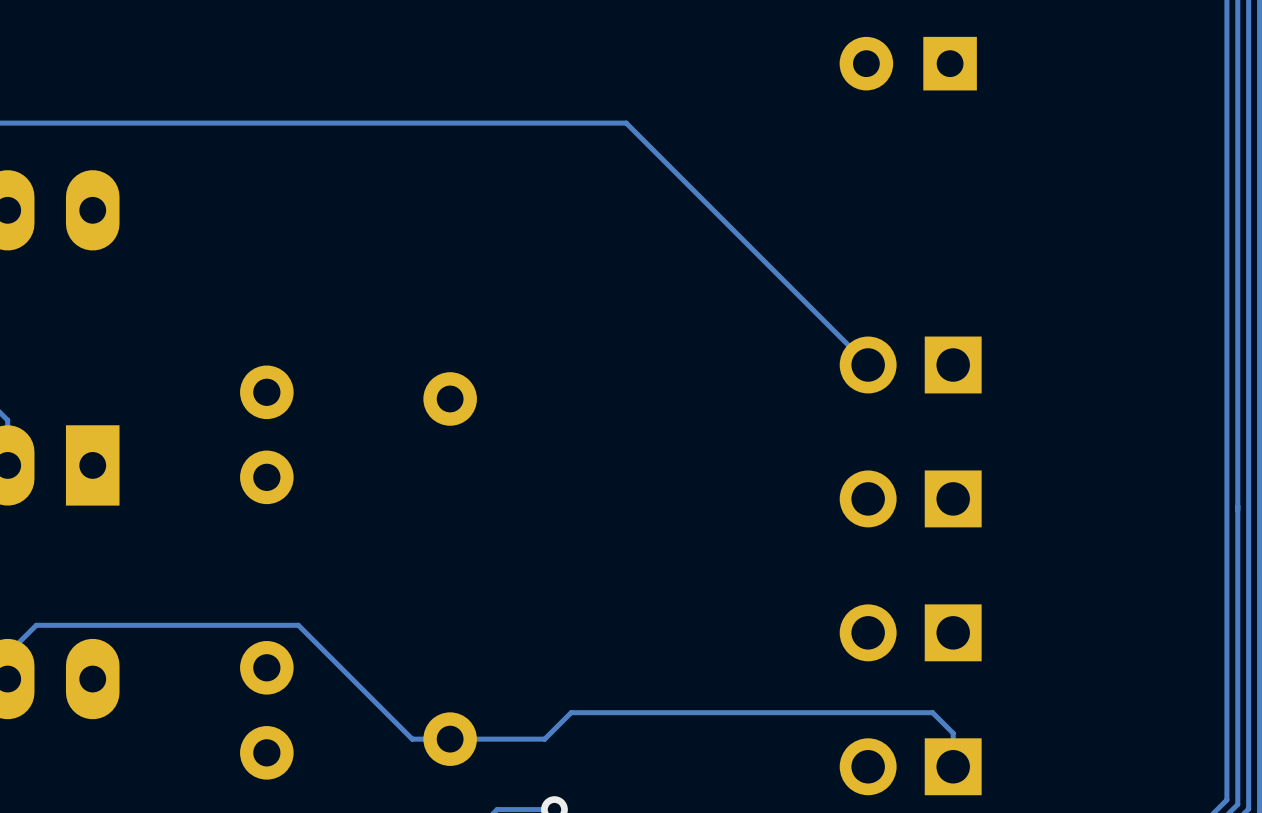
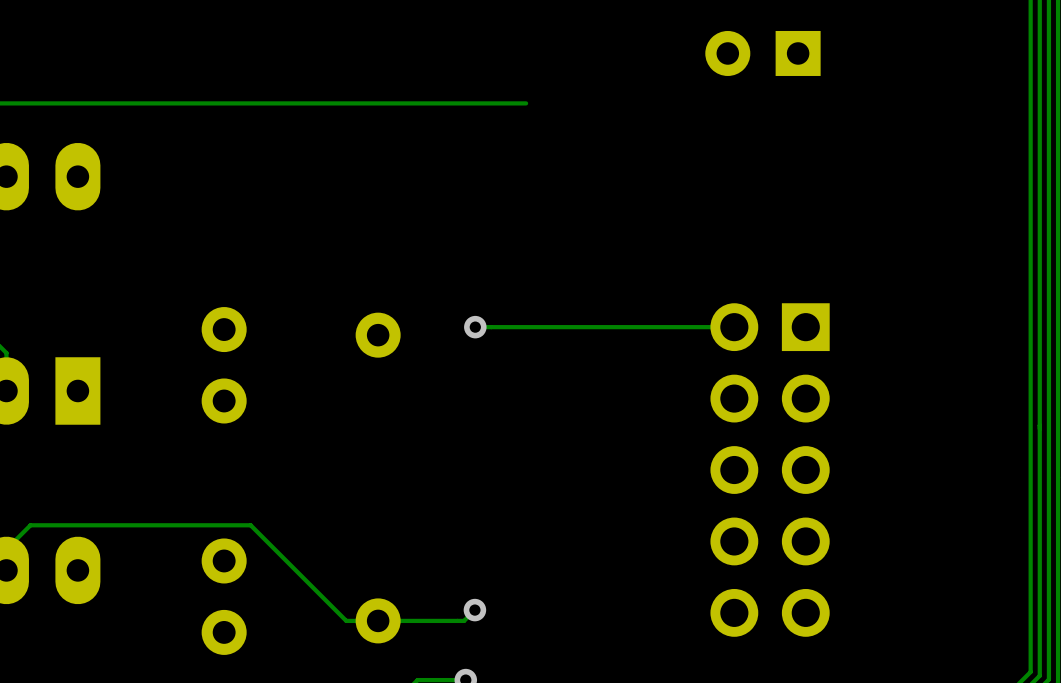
track: (626, 123) (868, 364) -> none
part: (910, 364) -> none
via: none -> (475, 327)
track: none -> (734, 327) (475, 327)
part: (910, 498) -> none
part: none -> (770, 470)
part: (910, 632) -> none
via: none -> (474, 610)
track: (544, 739) (571, 712) (932, 712) (953, 733) (953, 766) -> (457, 620) (464, 620) (474, 610)
part: (910, 766) -> none

